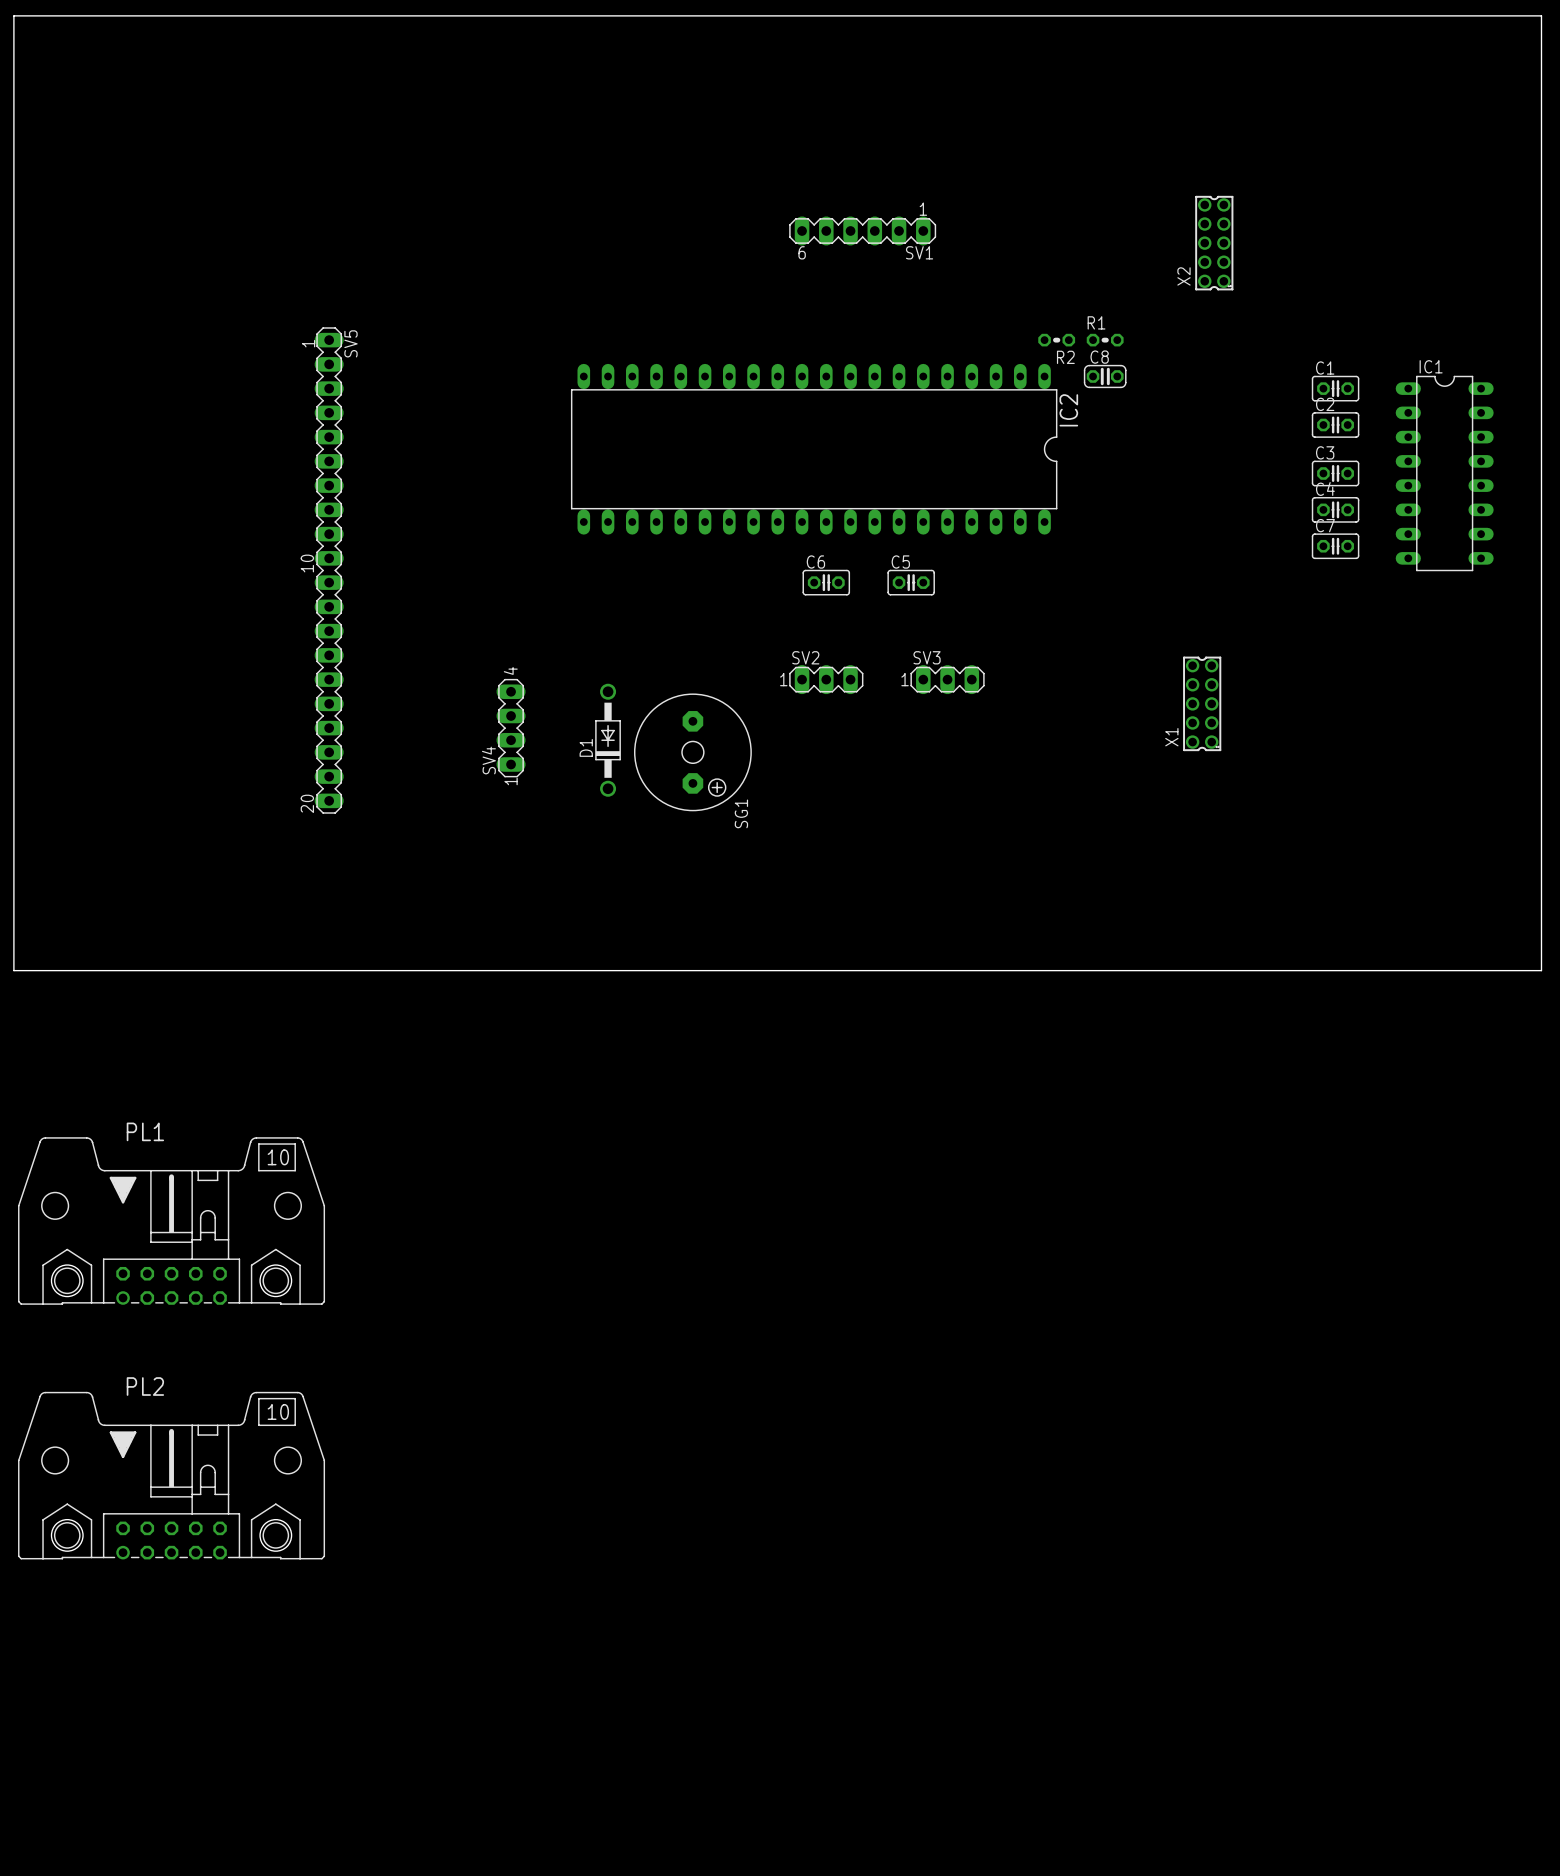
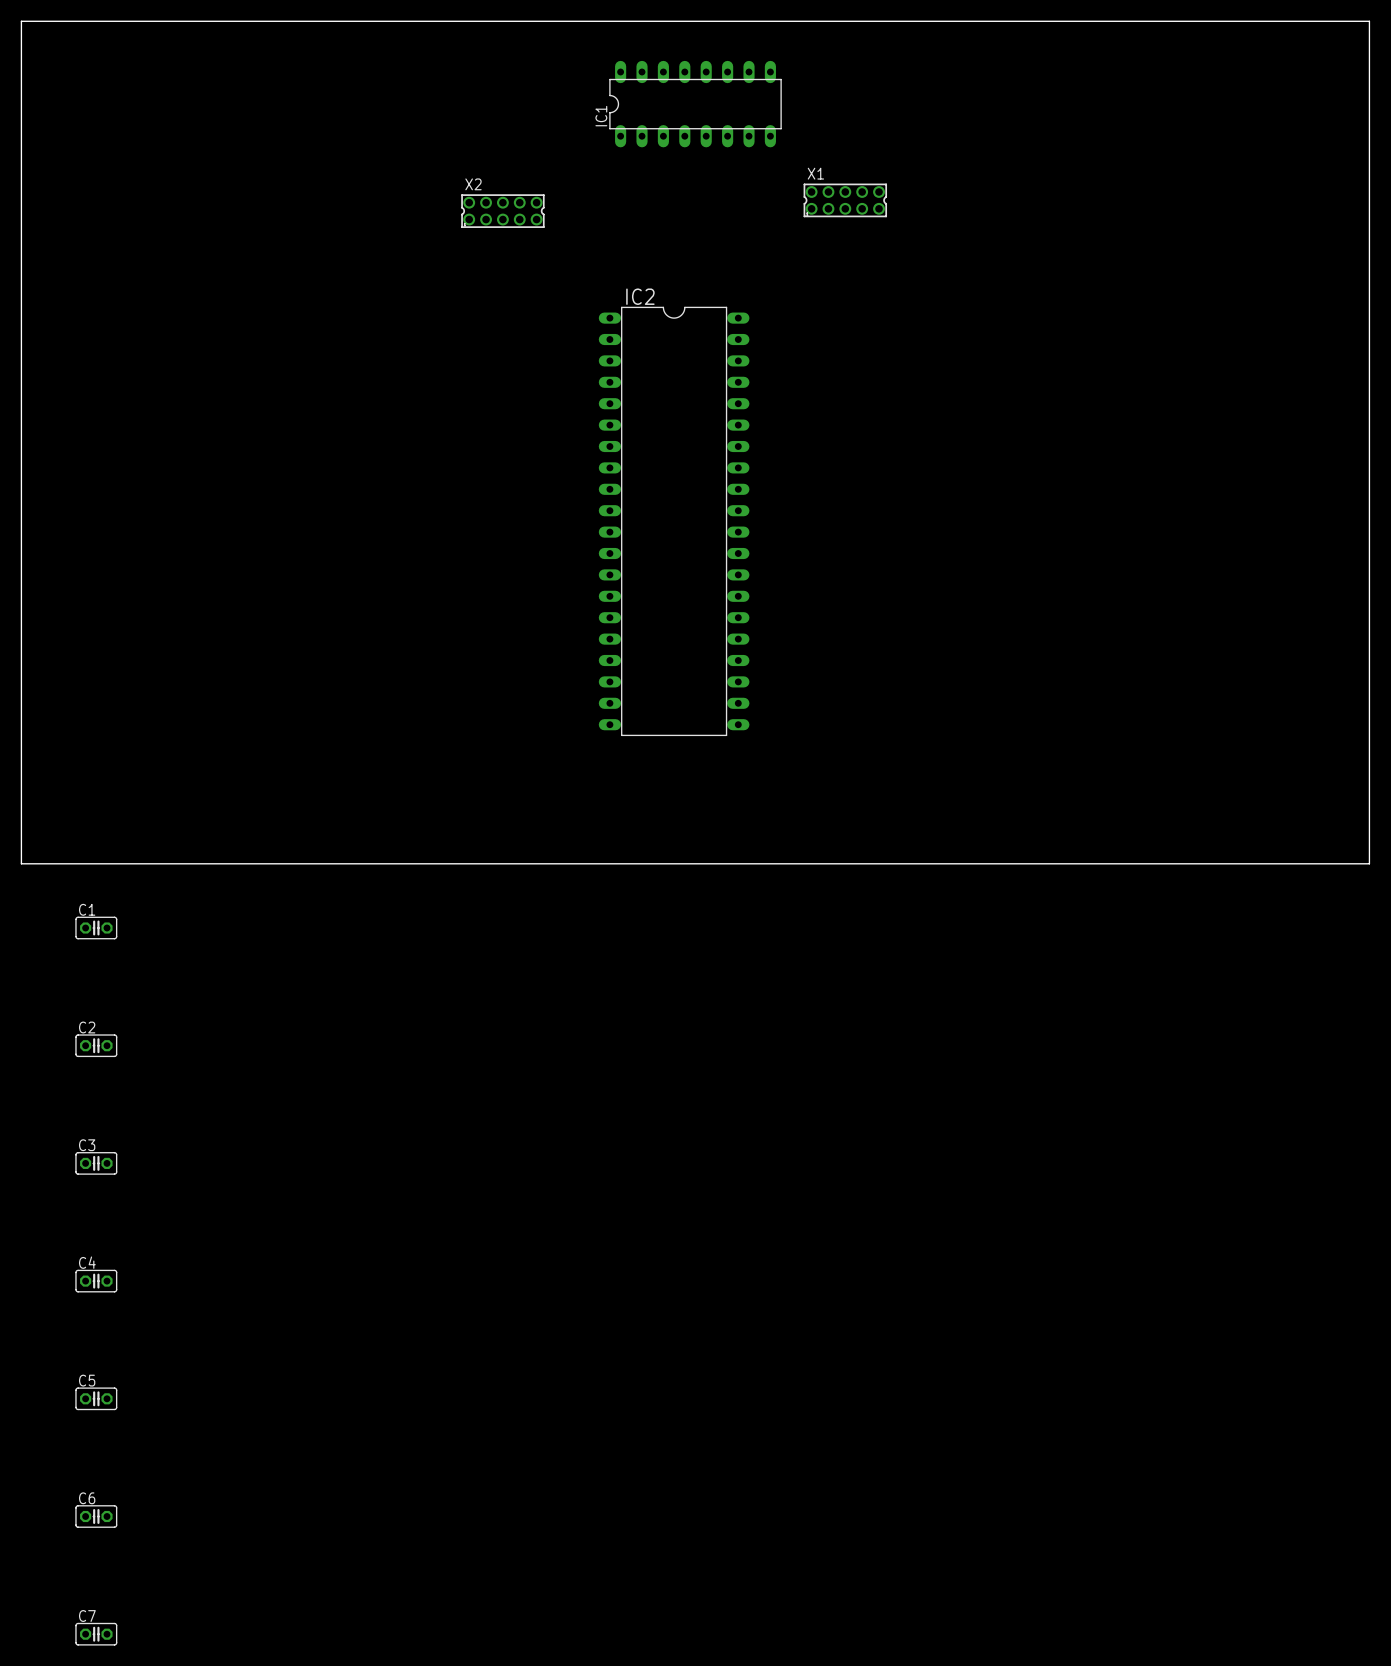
SV1: (862, 230) -> none
X2 rotation: 0° (1214, 243) -> 90° clockwise (502, 211)
X2 position: (1214, 243) -> (502, 211)
R2: (1056, 340) -> none
R1: (1105, 340) -> none
C8: (1105, 376) -> none
C1 position: (1335, 388) -> (96, 928)
C2 position: (1335, 424) -> (96, 1045)
IC2 rotation: 0° (814, 449) -> 90° counterclockwise (674, 521)
C3 position: (1335, 473) -> (96, 1163)
IC1 rotation: 0° (1444, 473) -> 90° counterclockwise (695, 104)
IC1 position: (1444, 473) -> (695, 104)
C4 position: (1335, 509) -> (96, 1281)
C7 position: (1335, 546) -> (96, 1634)
SV5: (329, 570) -> none
C6 position: (826, 582) -> (96, 1516)
C5 position: (911, 582) -> (96, 1398)
SV2: (826, 679) -> none
SV3: (947, 679) -> none
X1 rotation: 0° (1202, 703) -> 90° clockwise (845, 200)
X1 position: (1202, 703) -> (845, 200)
SV4: (511, 728) -> none
D1: (608, 740) -> none
SG1: (692, 752) -> none
PL1: (171, 1221) -> none
PL2: (171, 1475) -> none

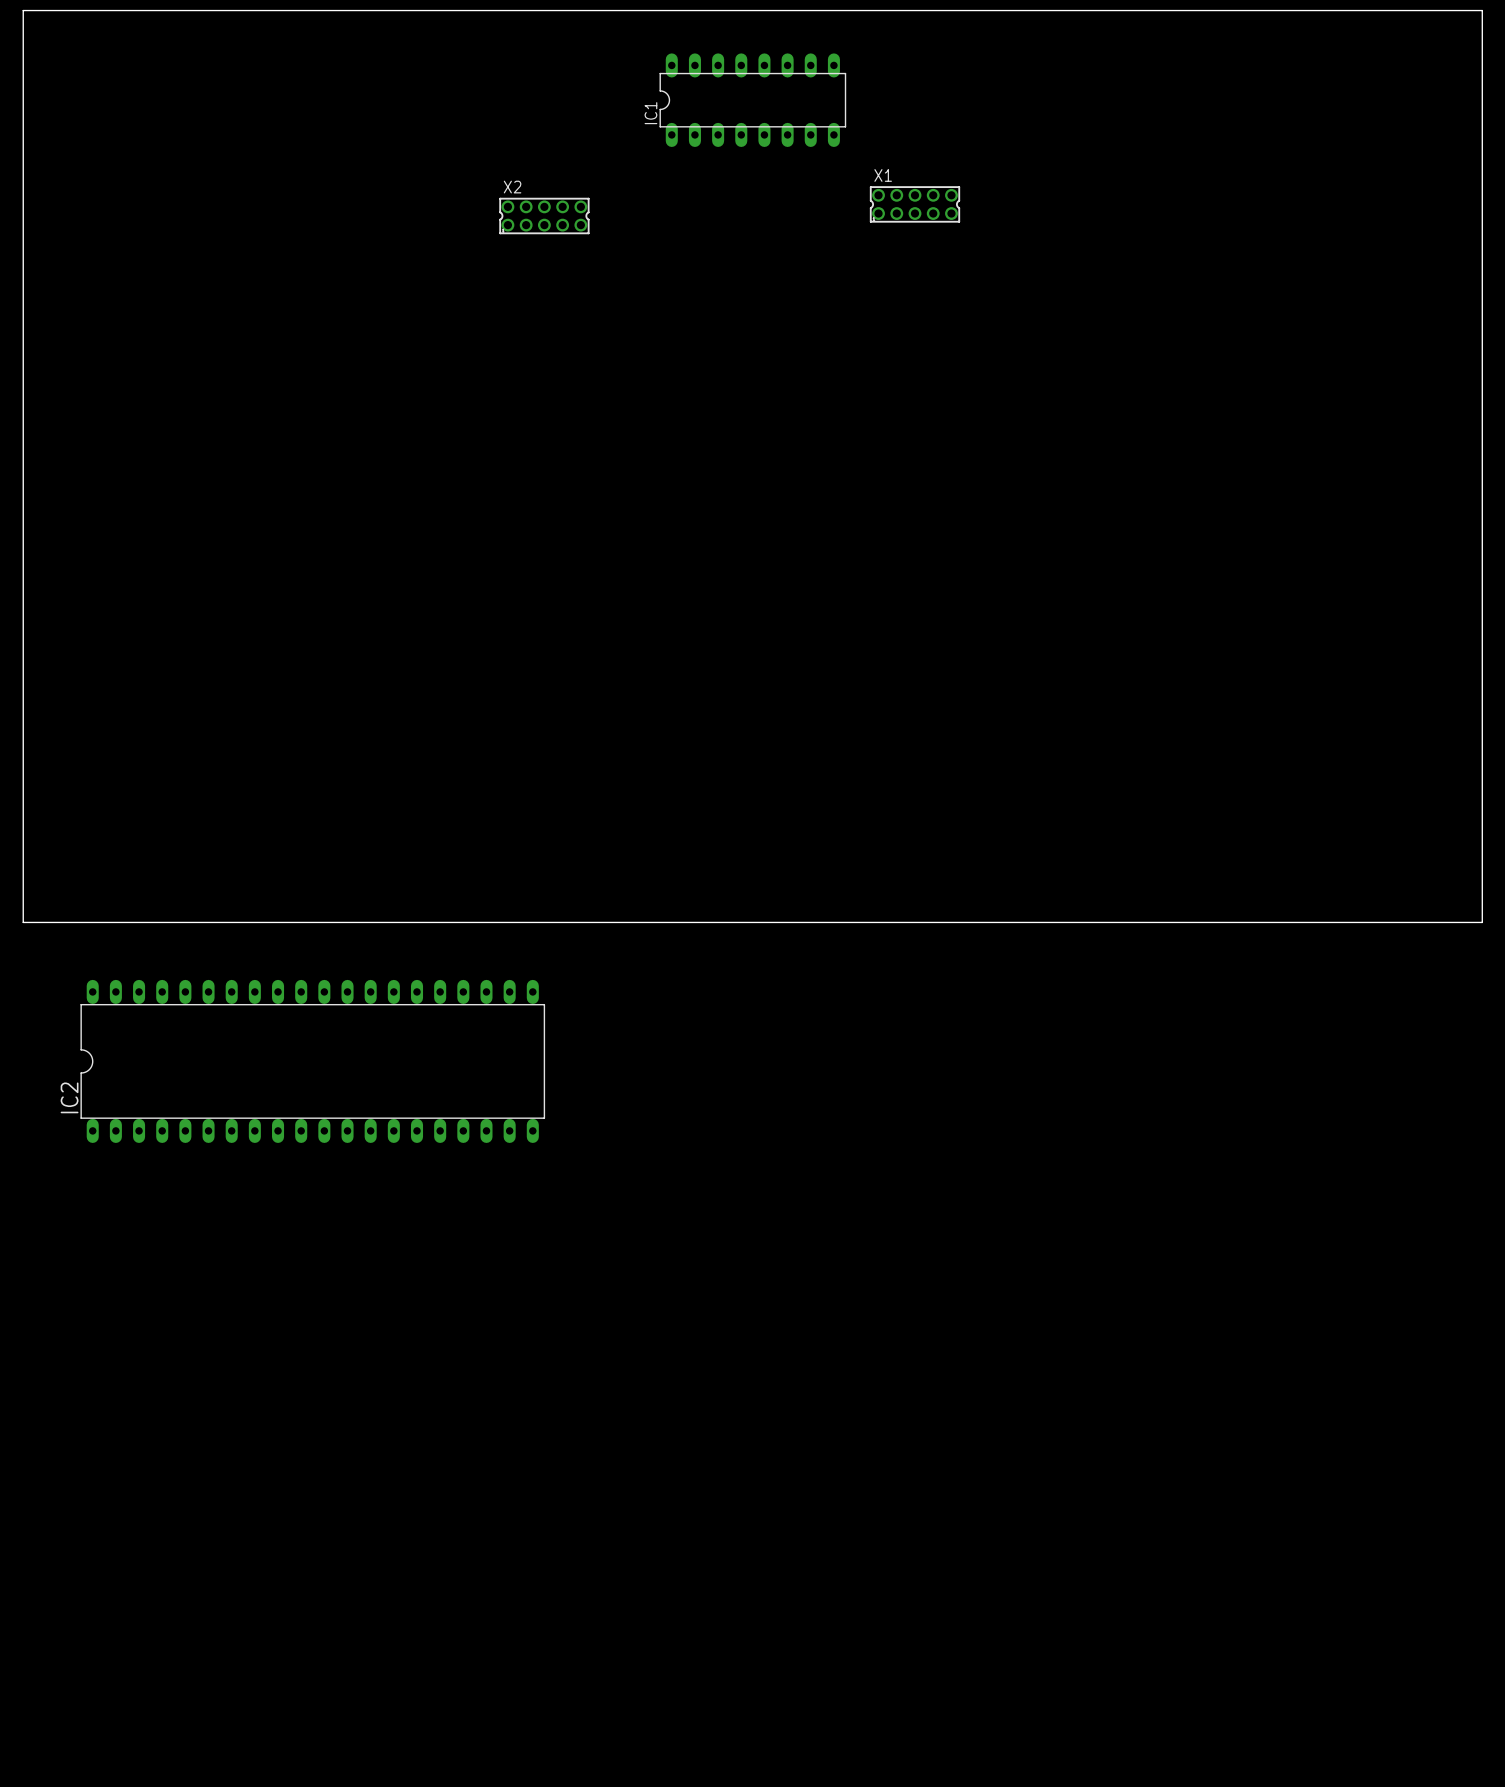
IC2 rotation: 0° (674, 521) -> 90° counterclockwise (312, 1061)
IC2 position: (674, 521) -> (312, 1061)
C1: (96, 928) -> none
C2: (96, 1045) -> none
C3: (96, 1163) -> none
C4: (96, 1281) -> none
C5: (96, 1398) -> none
C6: (96, 1516) -> none
C7: (96, 1634) -> none

